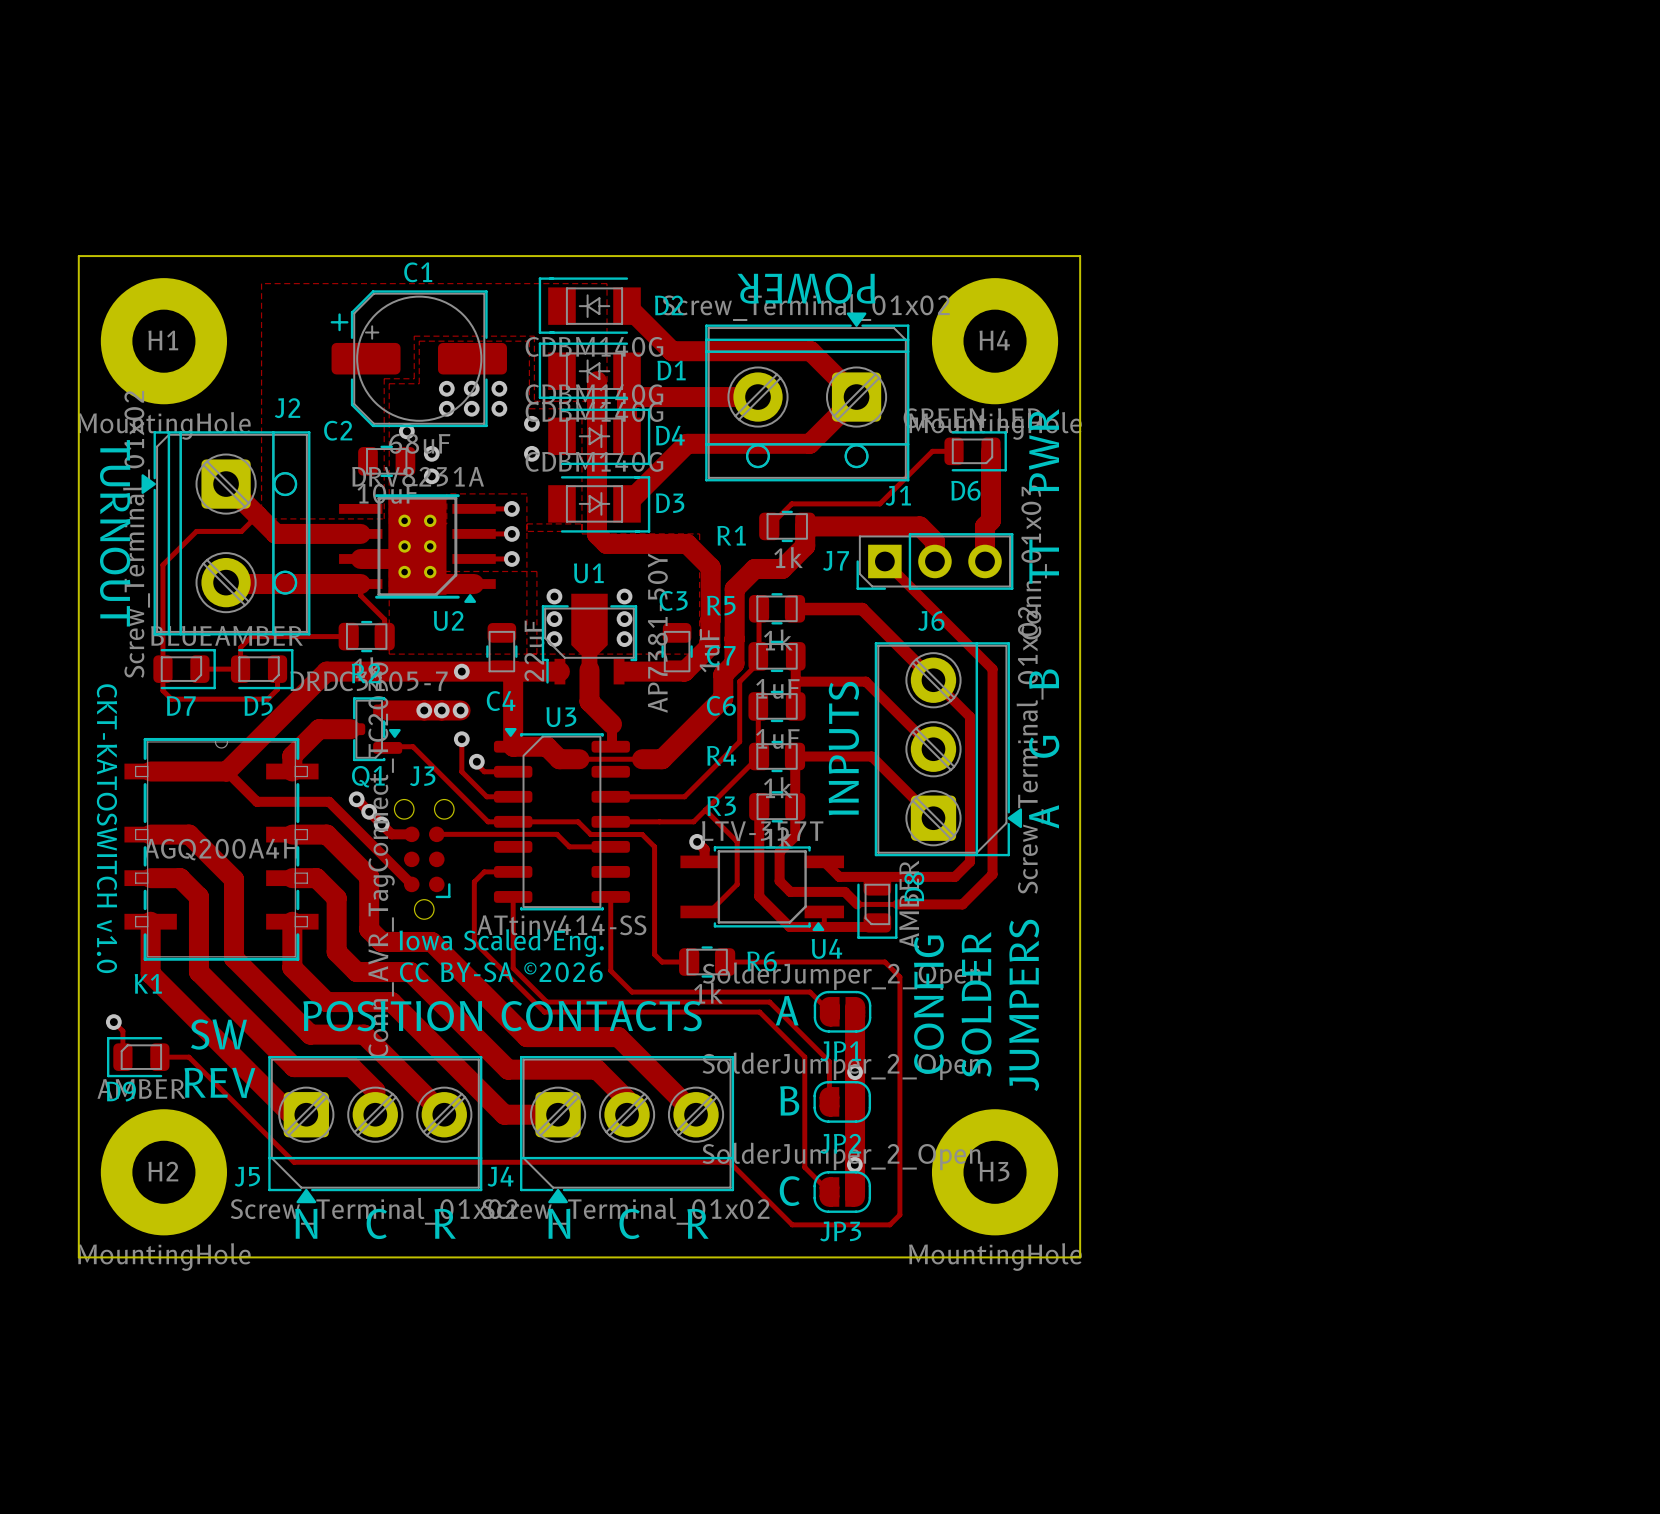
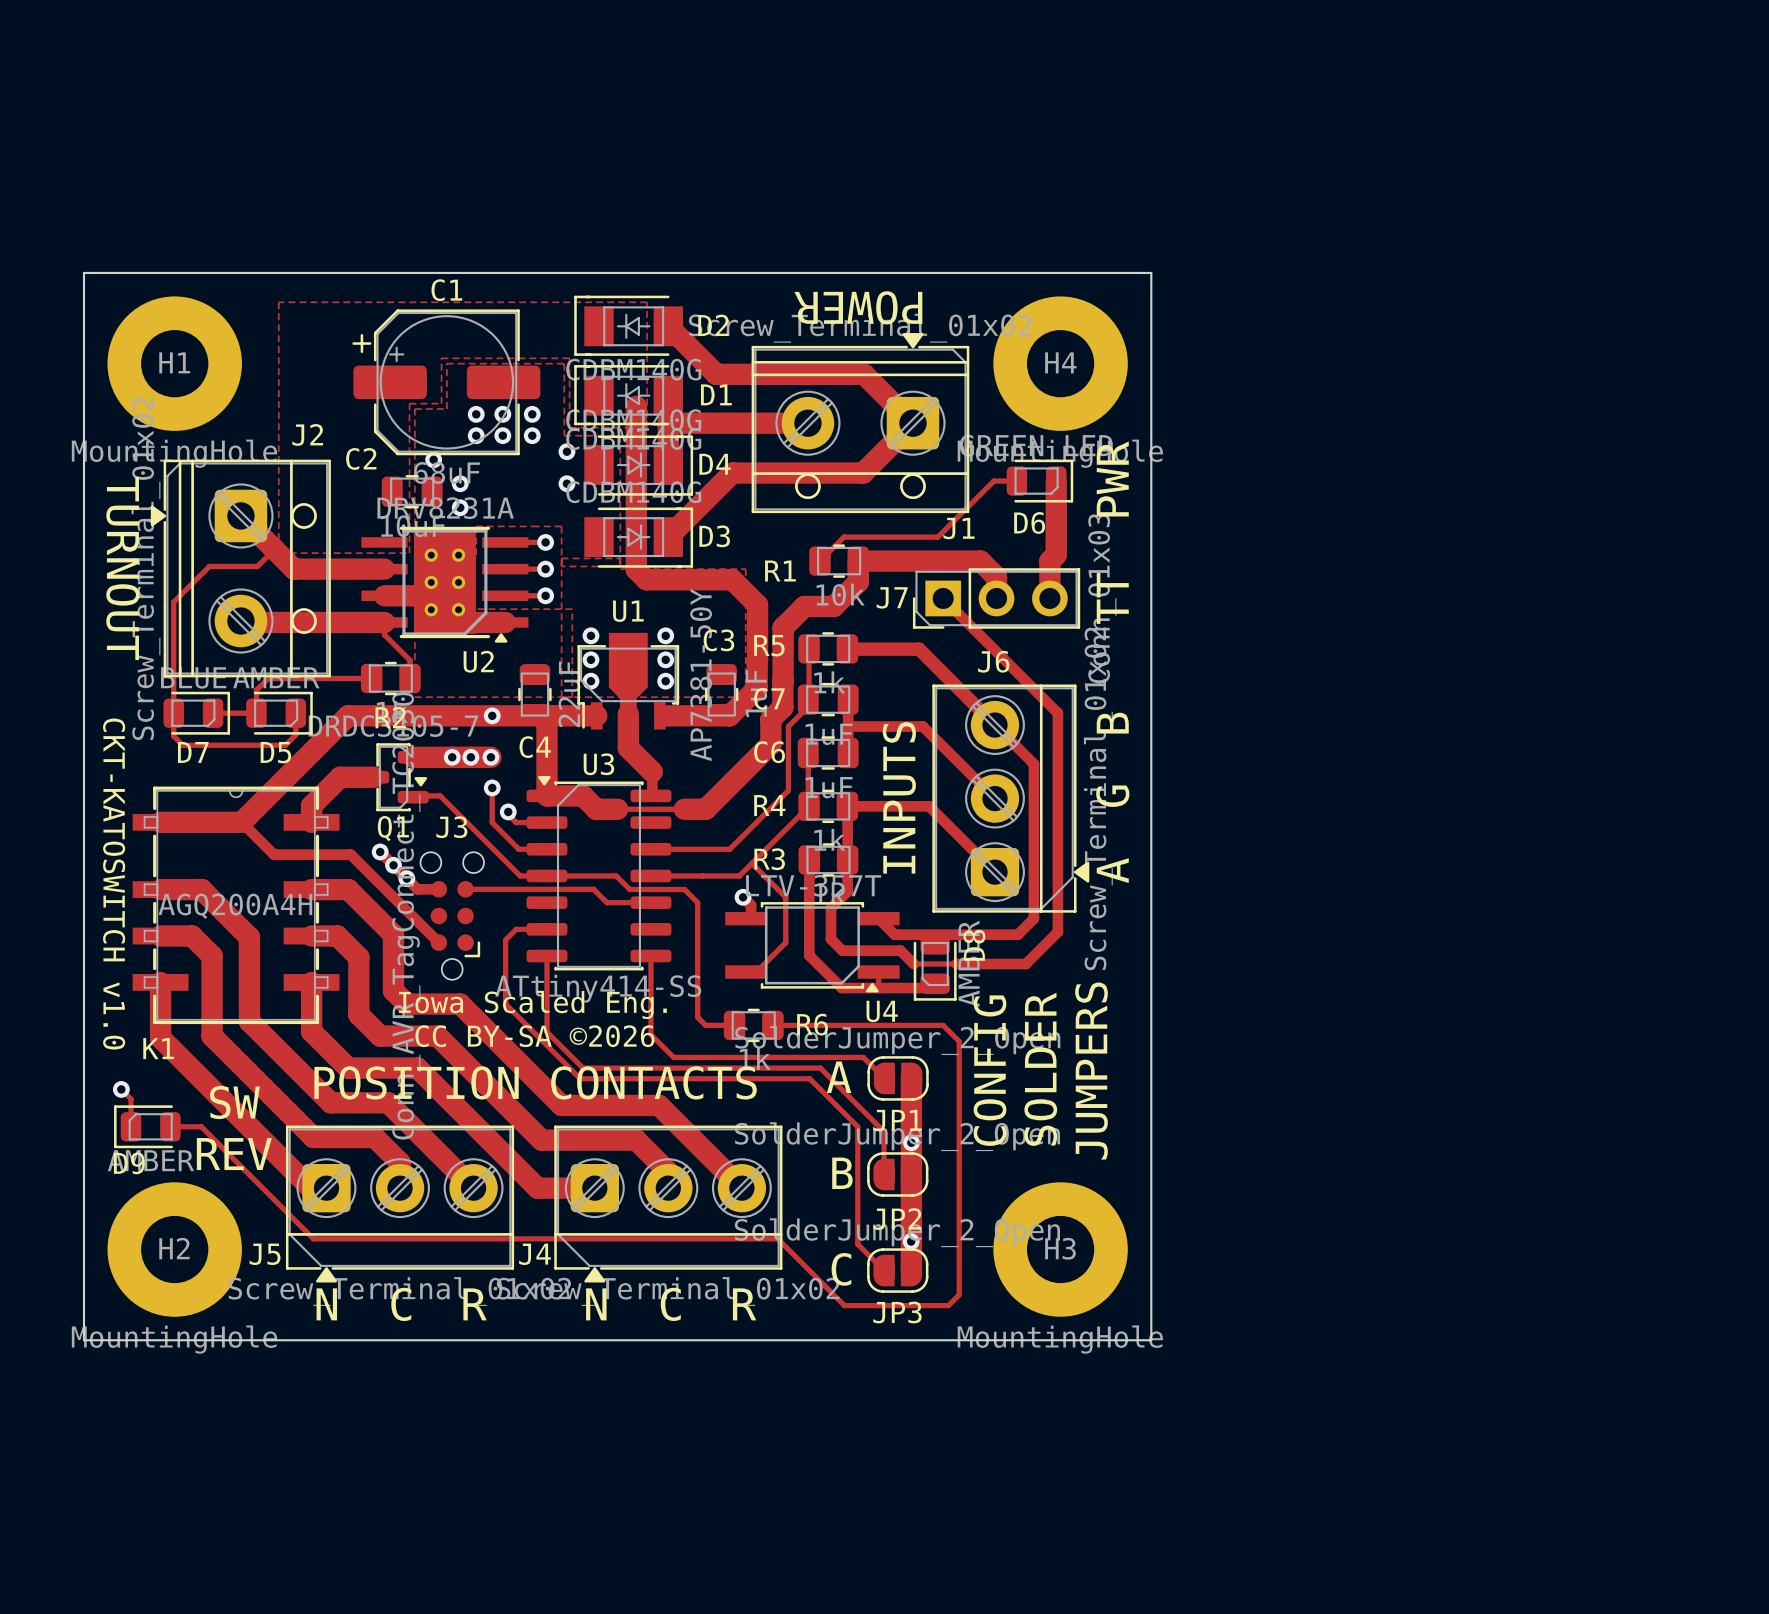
R1 value: 1k (788, 557) -> 10k (840, 594)

